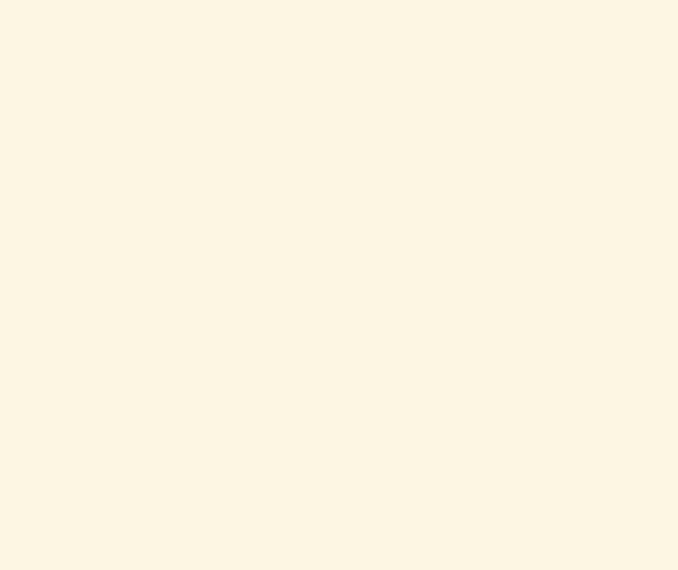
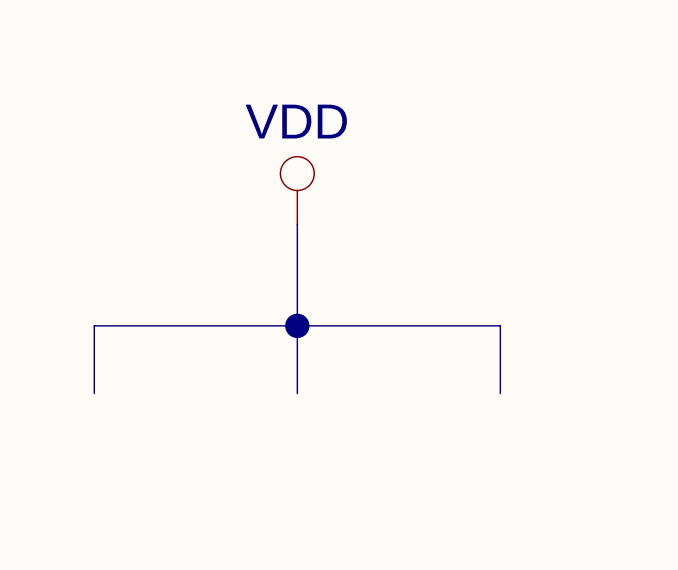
power symbol: none -> VDD (297, 190)
wire: none -> (297, 224) (297, 393)
junction: none -> (297, 325)
wire: none -> (94, 393) (94, 325) (500, 325) (500, 393)

